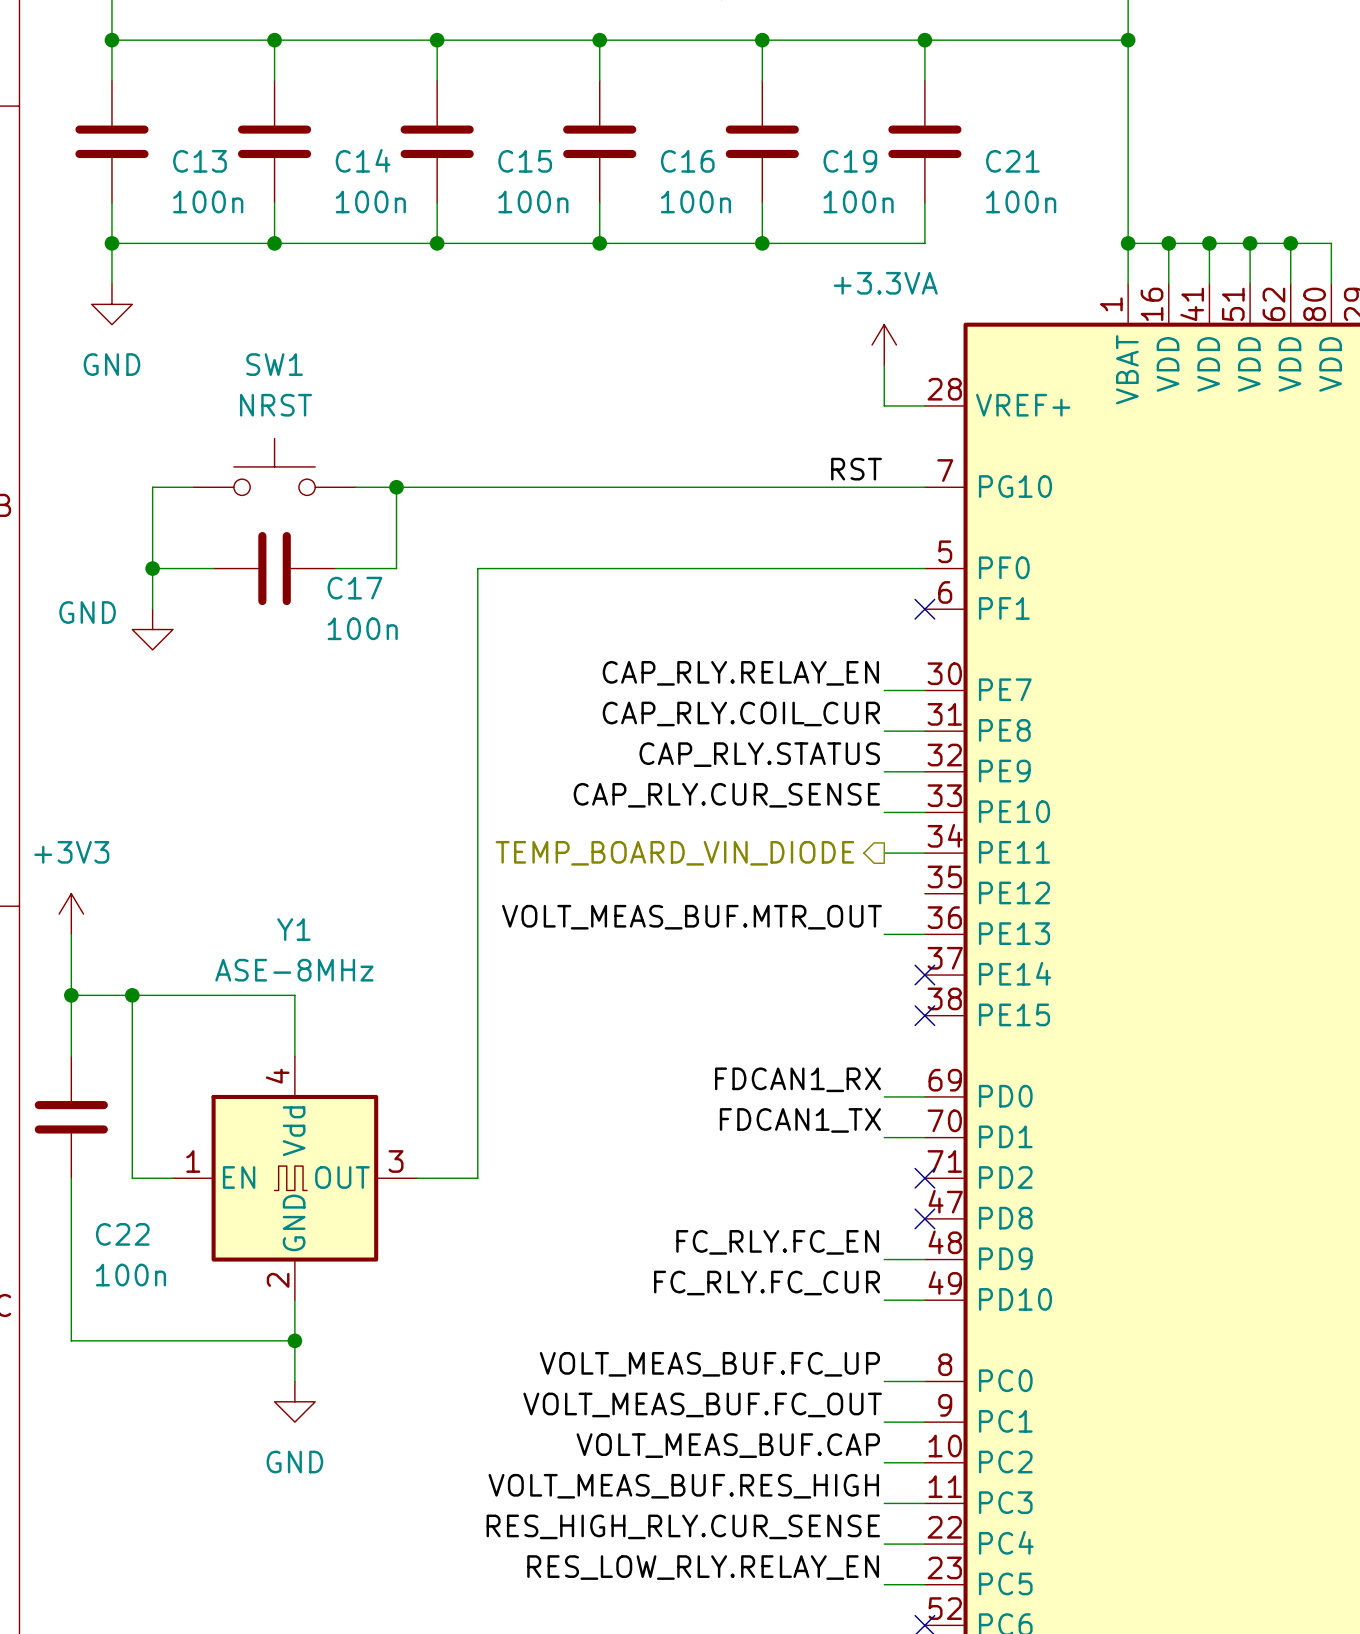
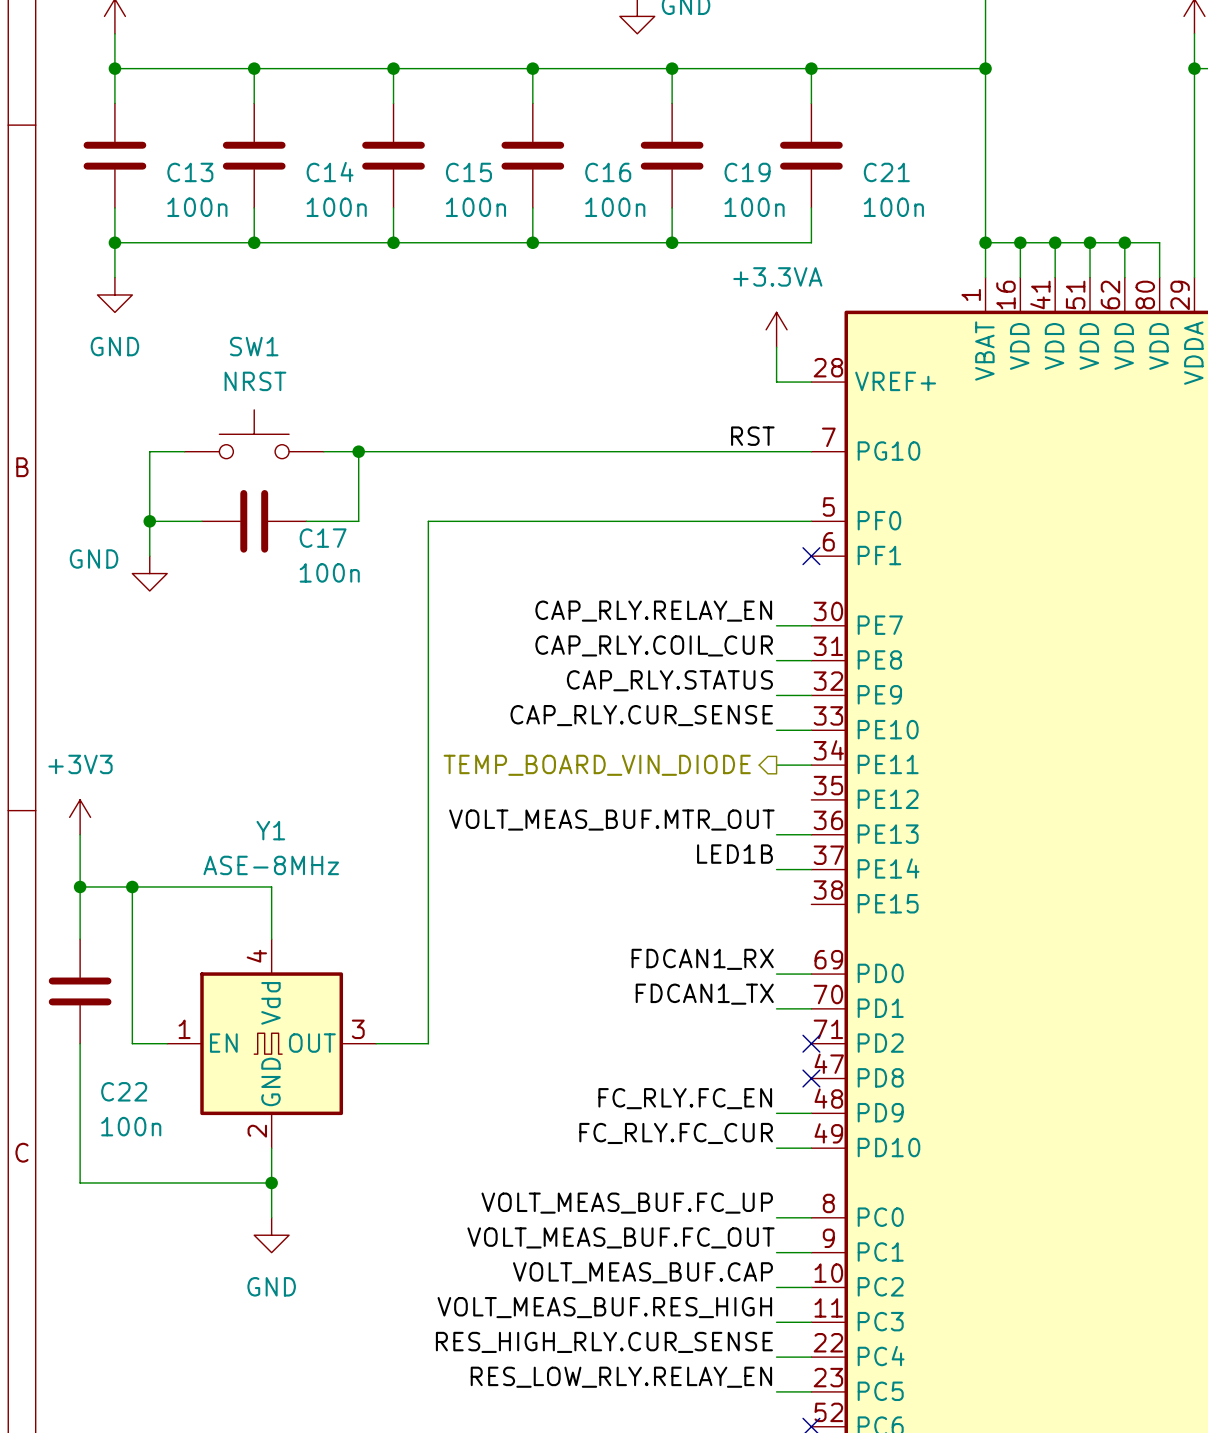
label: none -> LED1B (735, 854)
wire: none -> (776, 869) (811, 869)
no-connect mark: (924, 975) -> none
no-connect mark: (924, 1015) -> none

